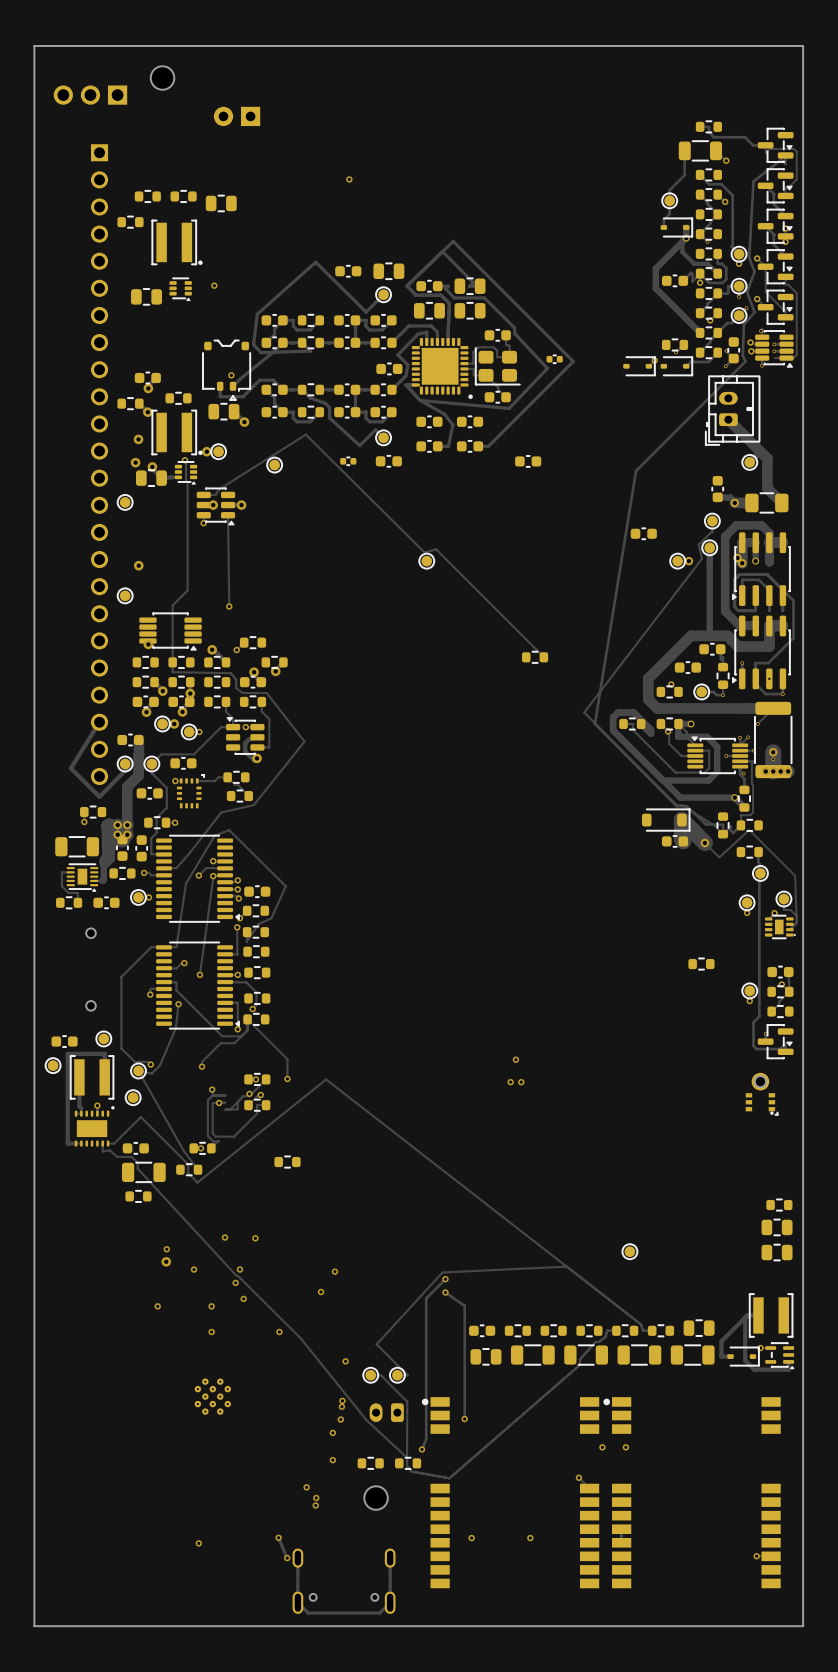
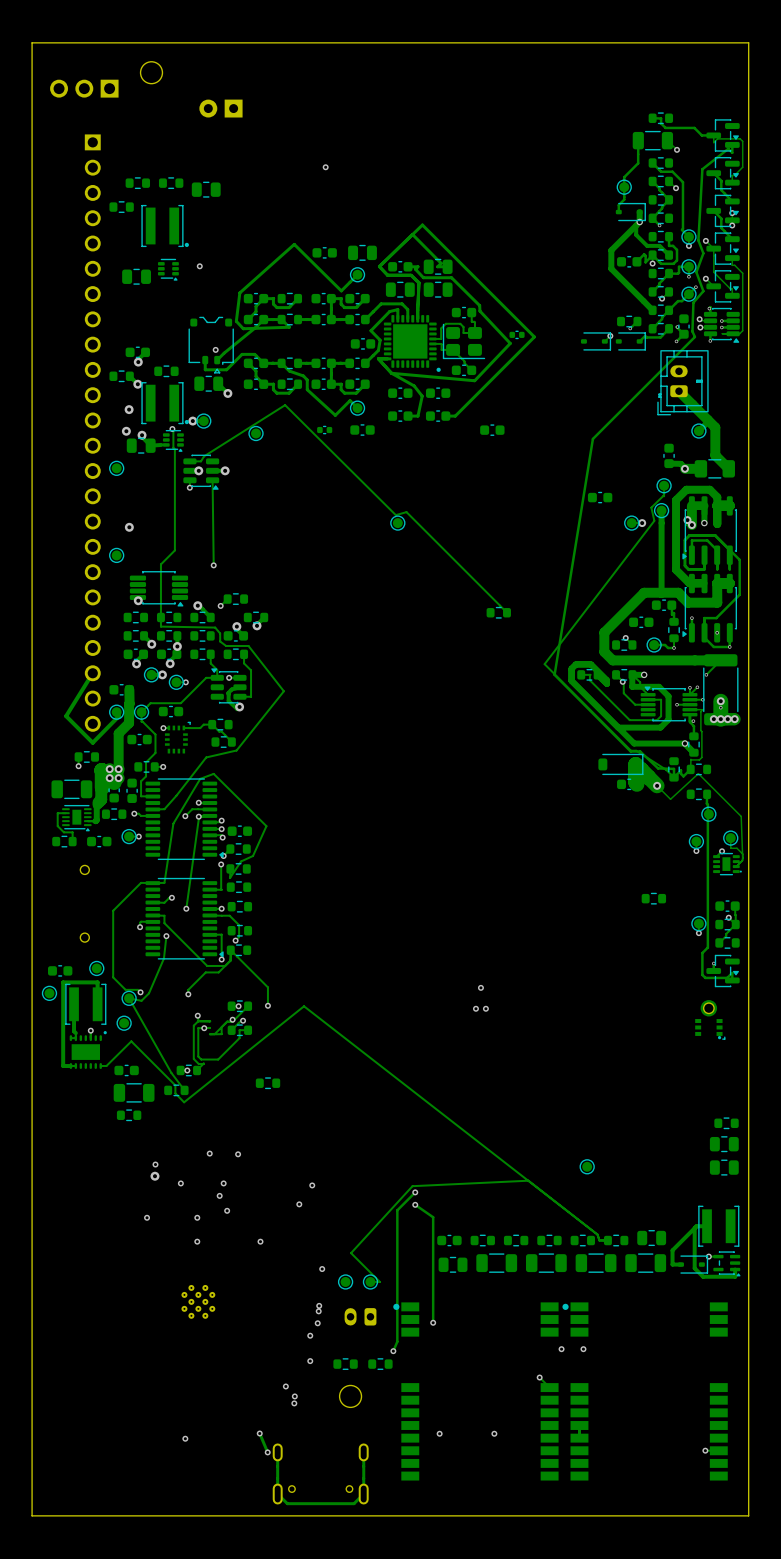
track: (102, 1143) (102, 1151) (109, 1150) (117, 1156) (131, 1156) (137, 1162) (137, 1168) (235, 1275) (301, 1338) (366, 1420) (407, 1457) (407, 1466) -> none
track: (616, 1330) (607, 1330) (605, 1337) (599, 1341) -> none
track: (599, 1341) (595, 1341) (580, 1359) (580, 1364) (449, 1478) (411, 1471) (407, 1466) -> none
track: (370, 1375) (380, 1375) (407, 1401) (407, 1466) -> none

